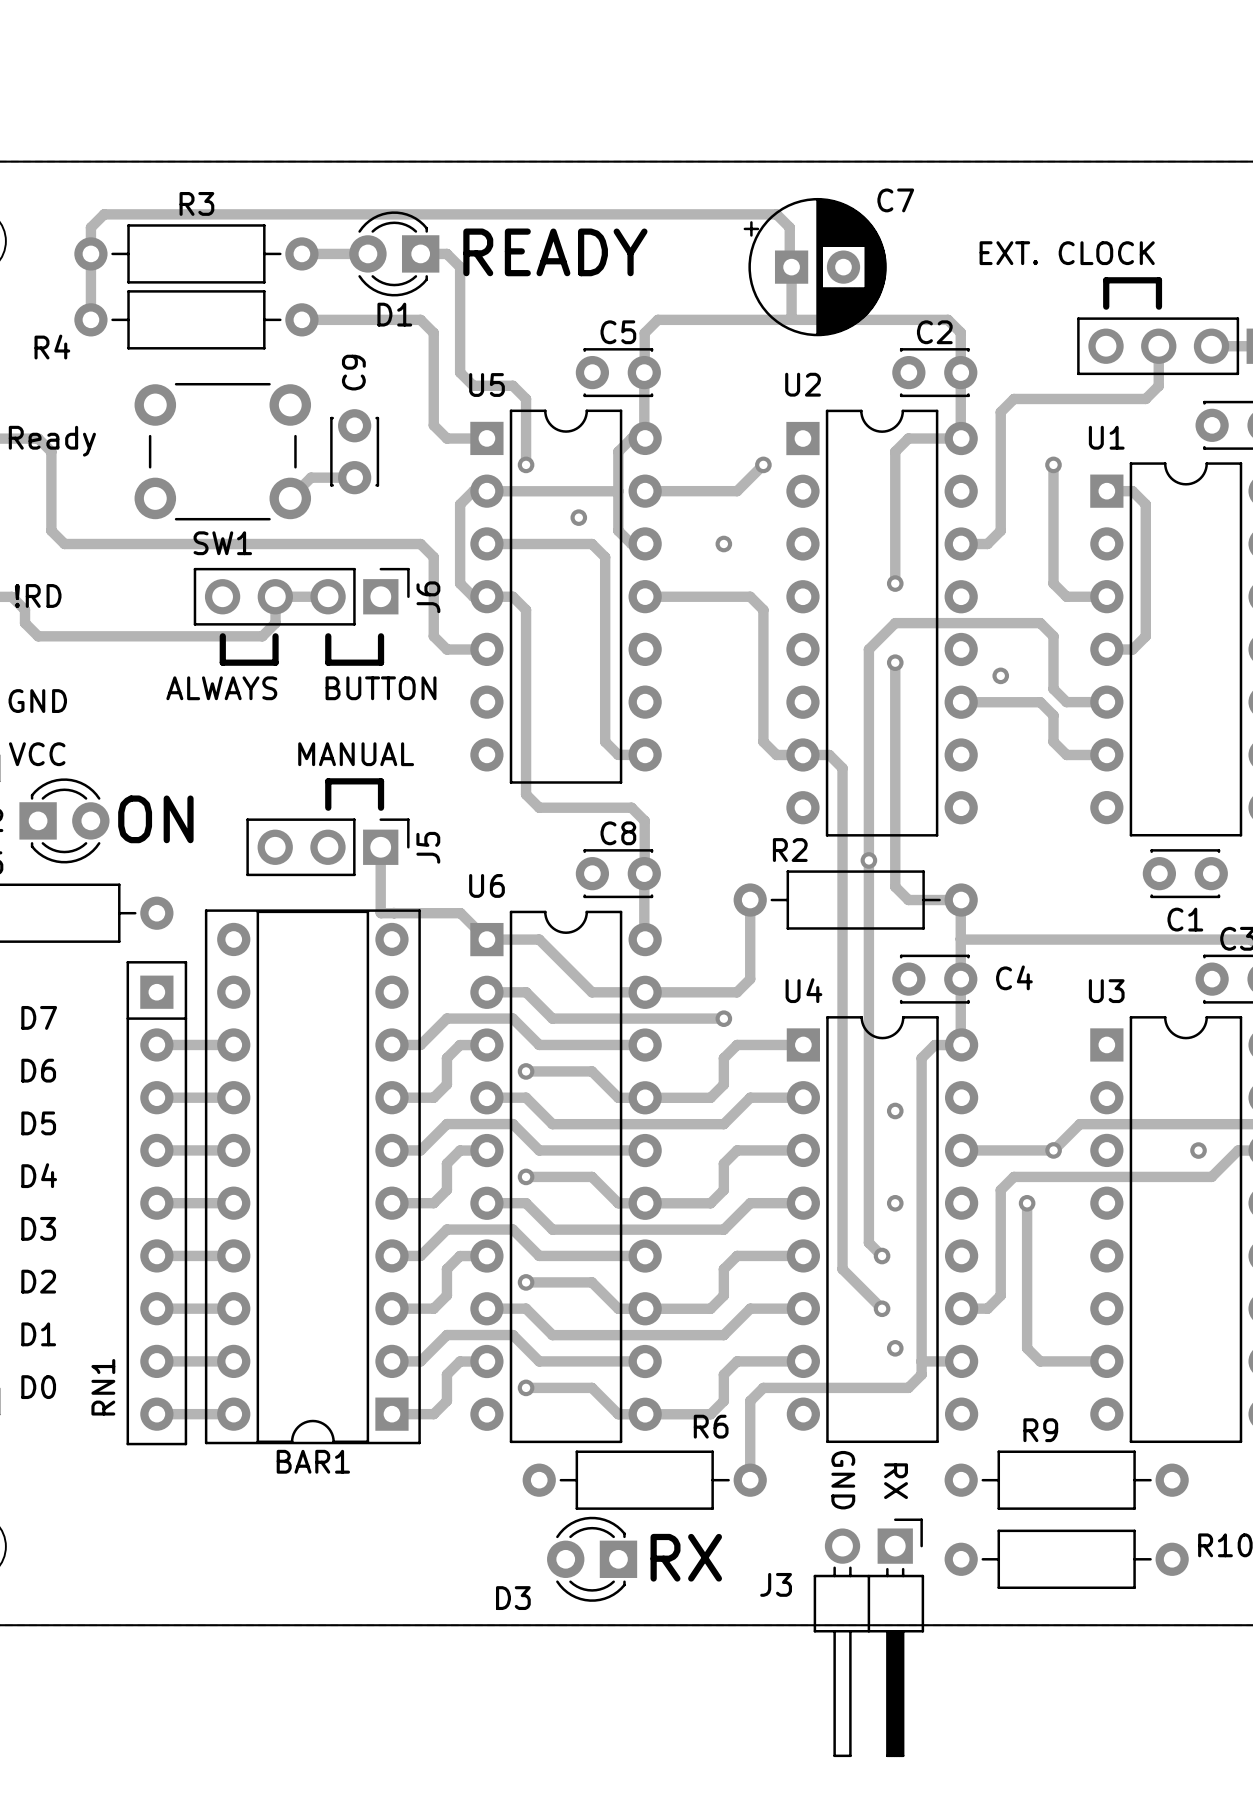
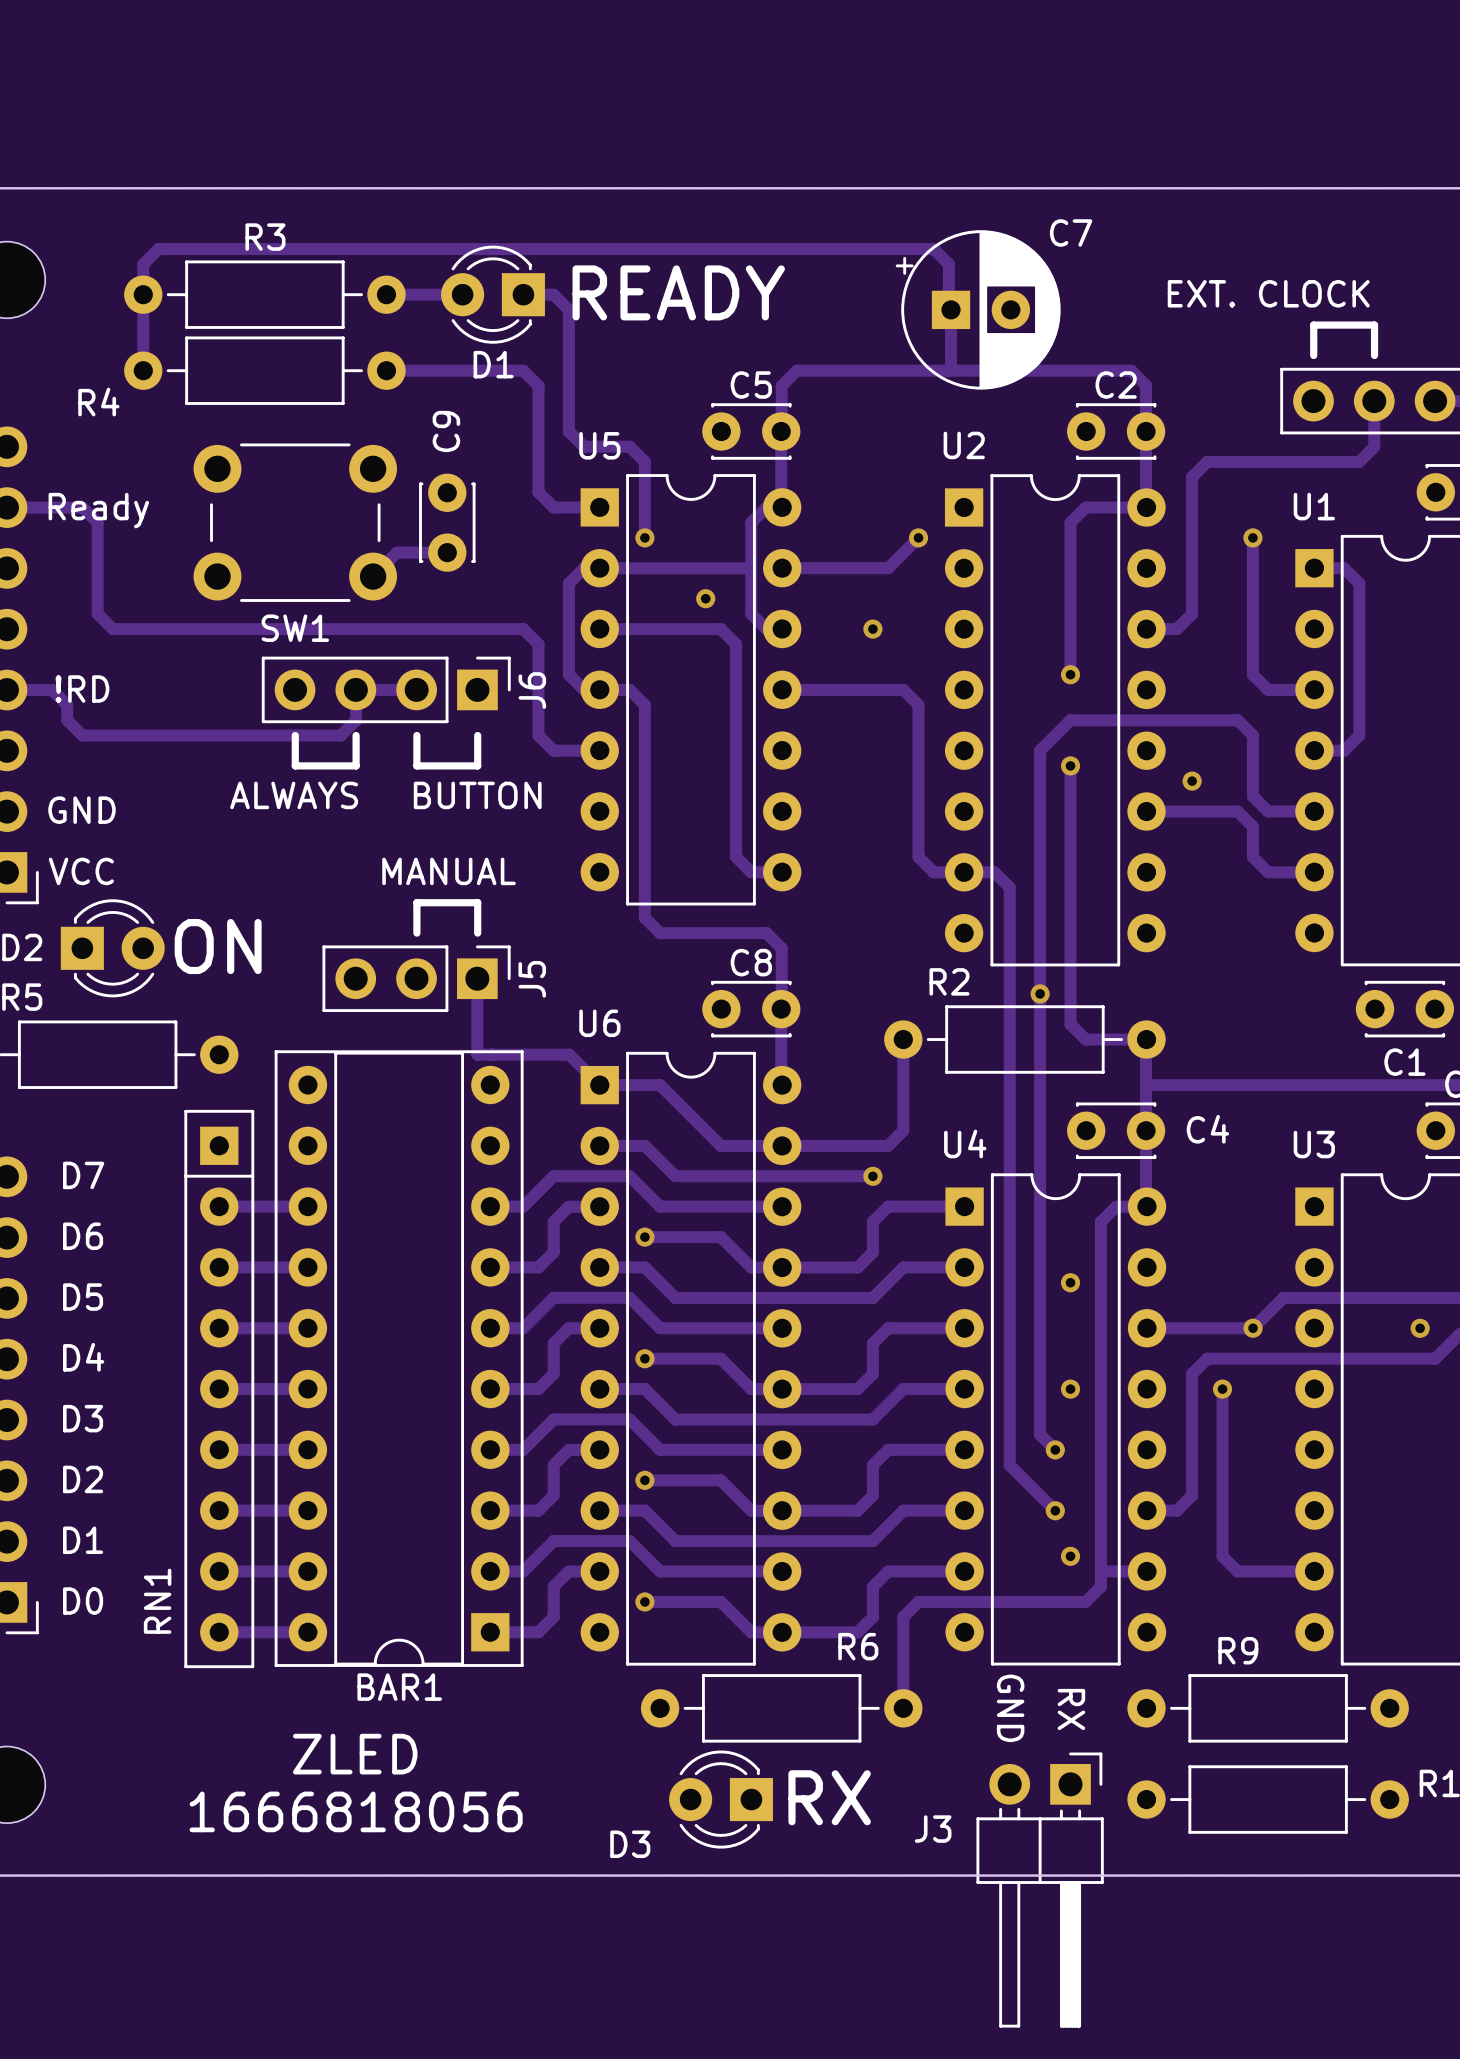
text: none -> ZLED (355, 1754)
text: none -> 1666818056 (356, 1811)

